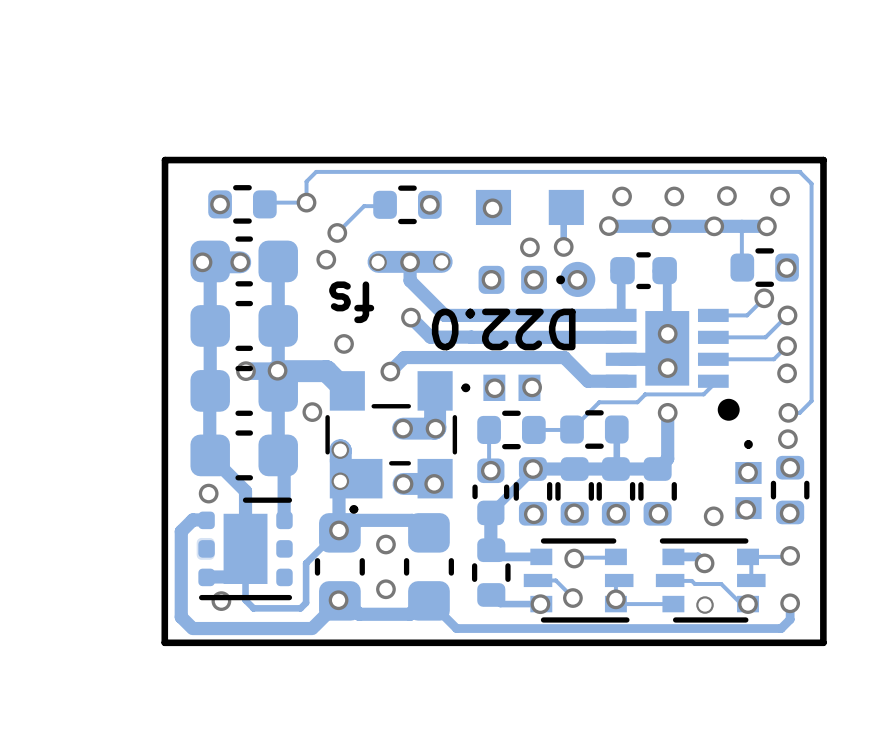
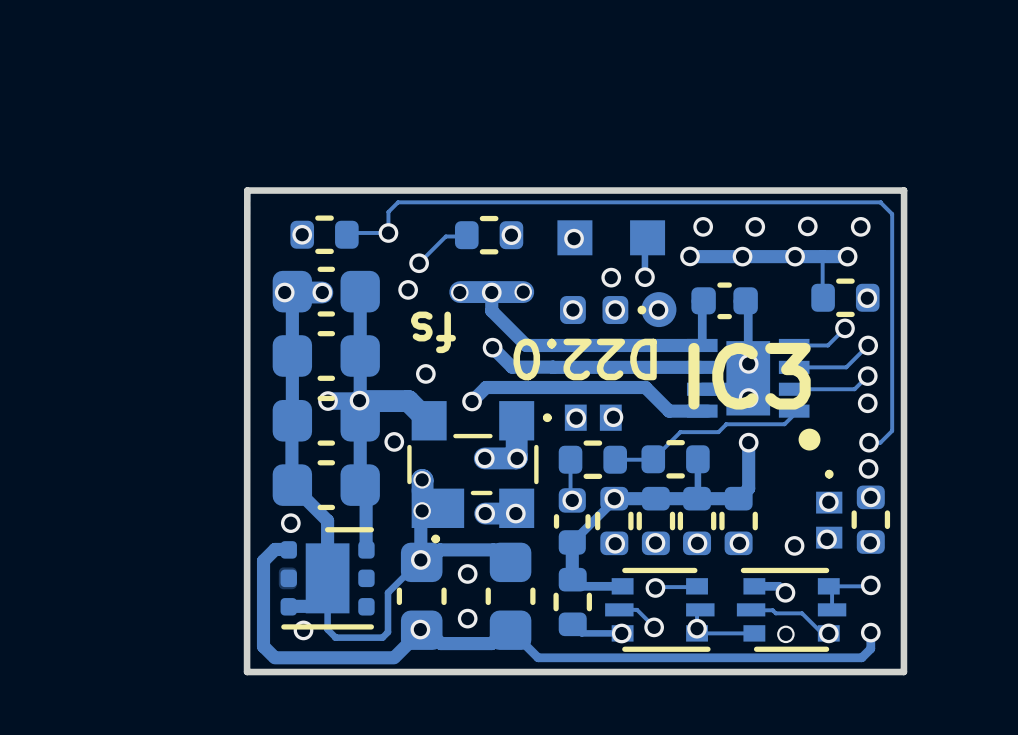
IC3 name: none -> IC3 (749, 376)

